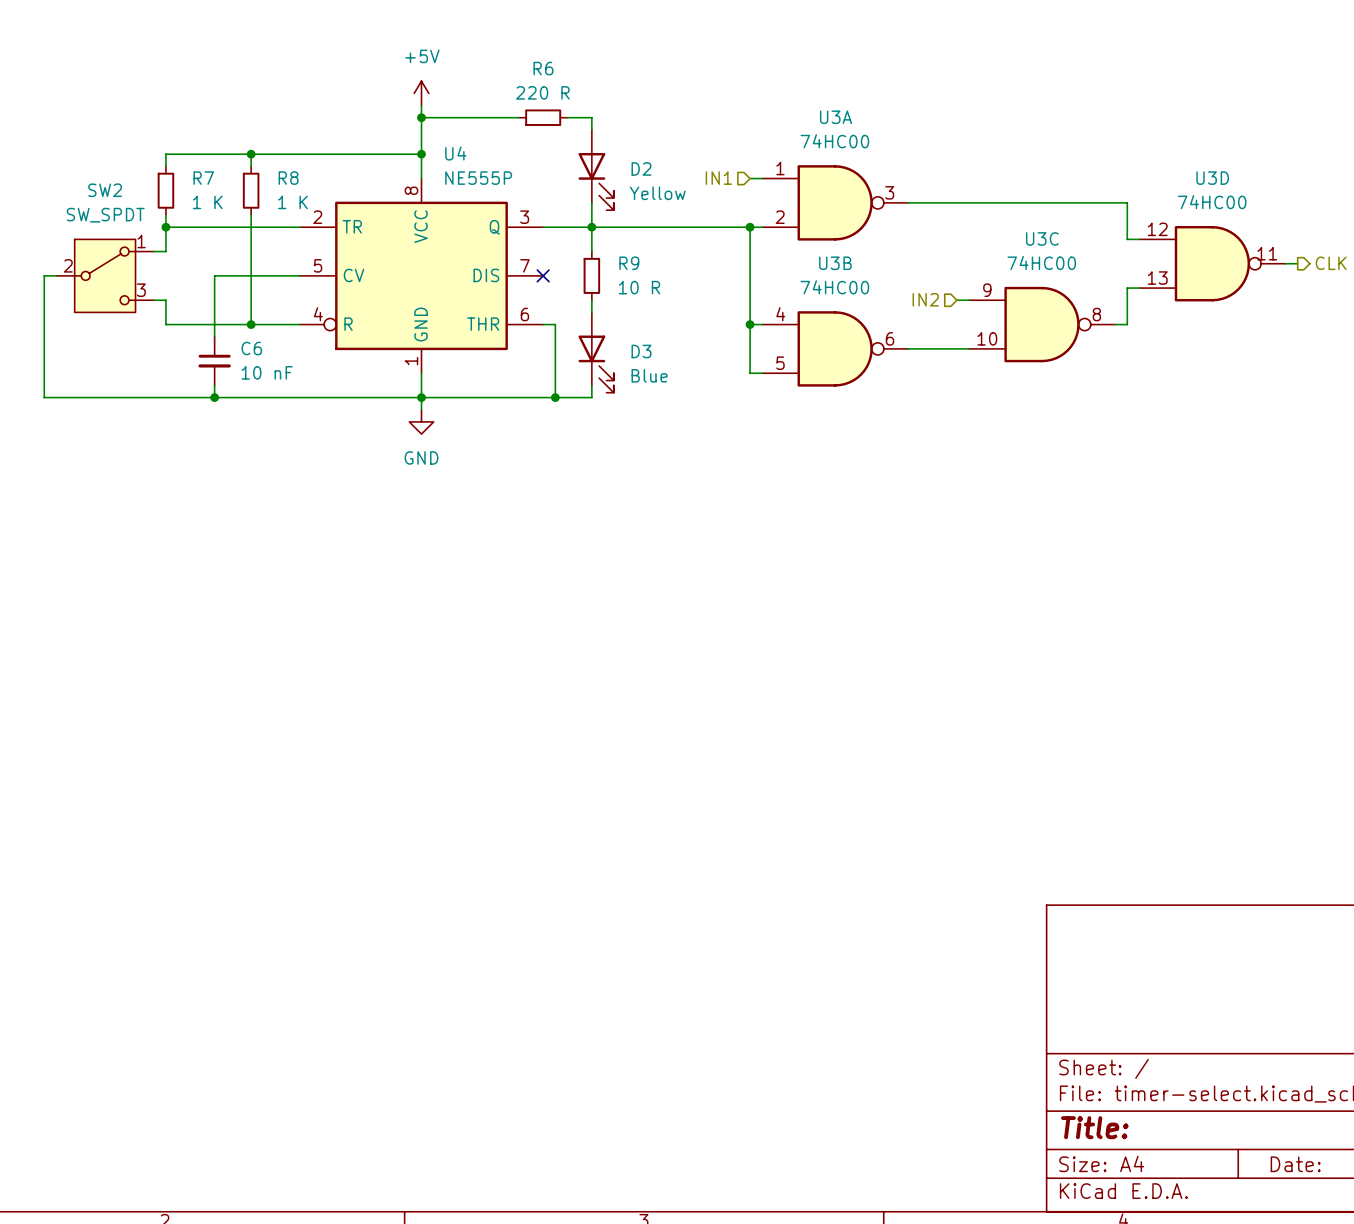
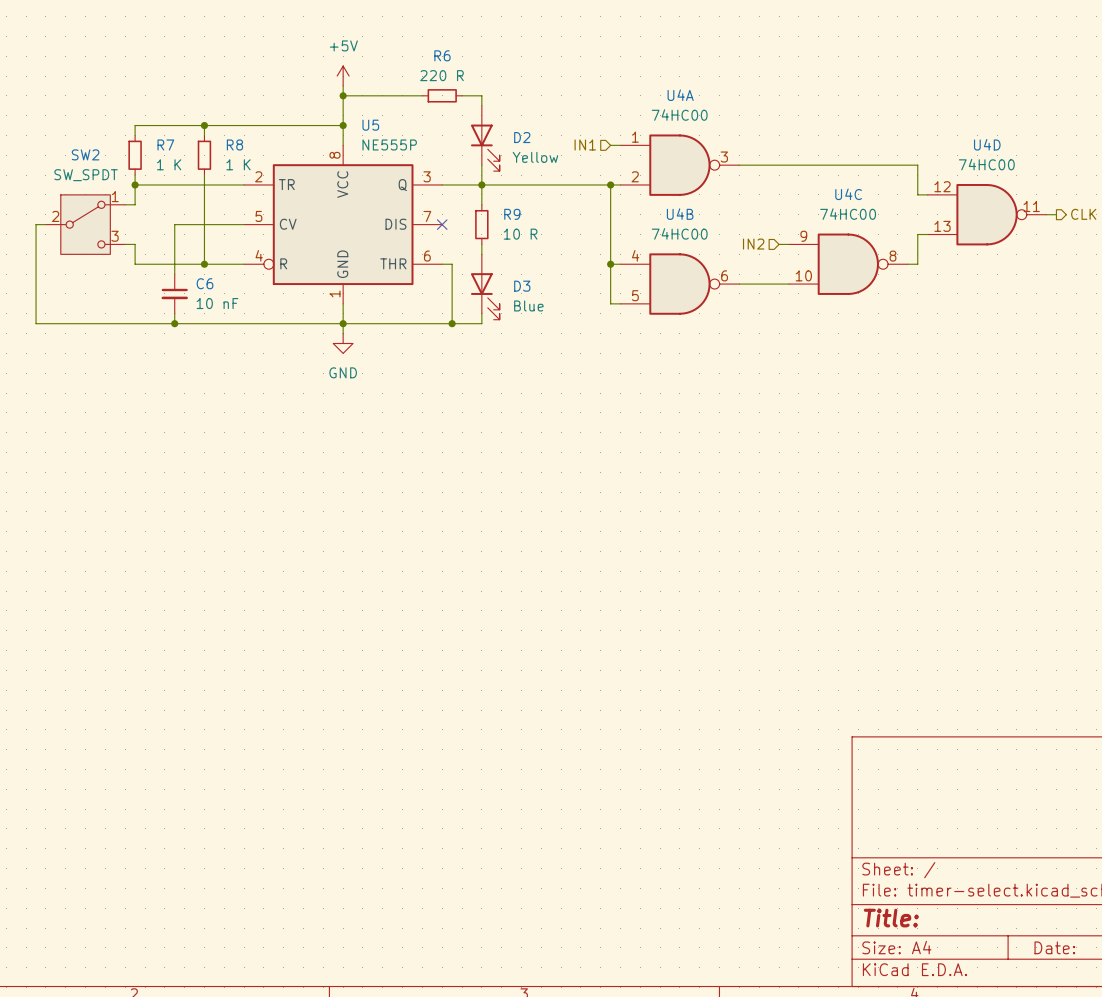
U3A name: U3A (836, 117) -> U4A (680, 95)
U4 name: U4 (455, 153) -> U5 (370, 125)
U3D name: U3D (1212, 178) -> U4D (987, 144)
U3C name: U3C (1042, 238) -> U4C (848, 194)
U3B name: U3B (835, 263) -> U4B (680, 214)

